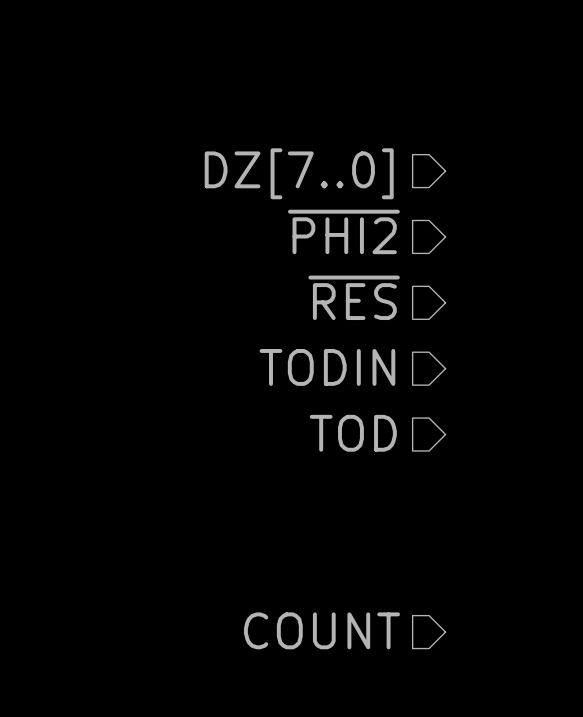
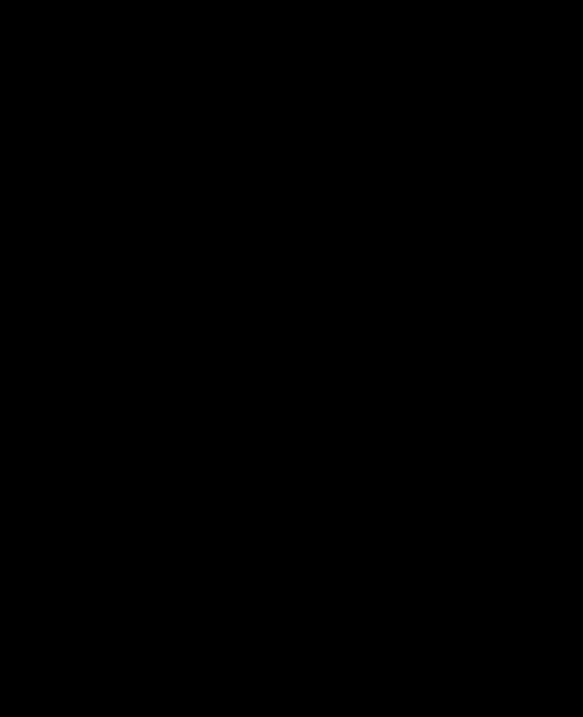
hierarchical label: DZ[7..0] (299, 173) -> none
hierarchical label: ~{PHI2} (343, 231) -> none
hierarchical label: ~{RES} (354, 297) -> none
hierarchical label: TODIN (327, 367) -> none
hierarchical label: TOD (353, 433) -> none
hierarchical label: COUNT (321, 630) -> none

